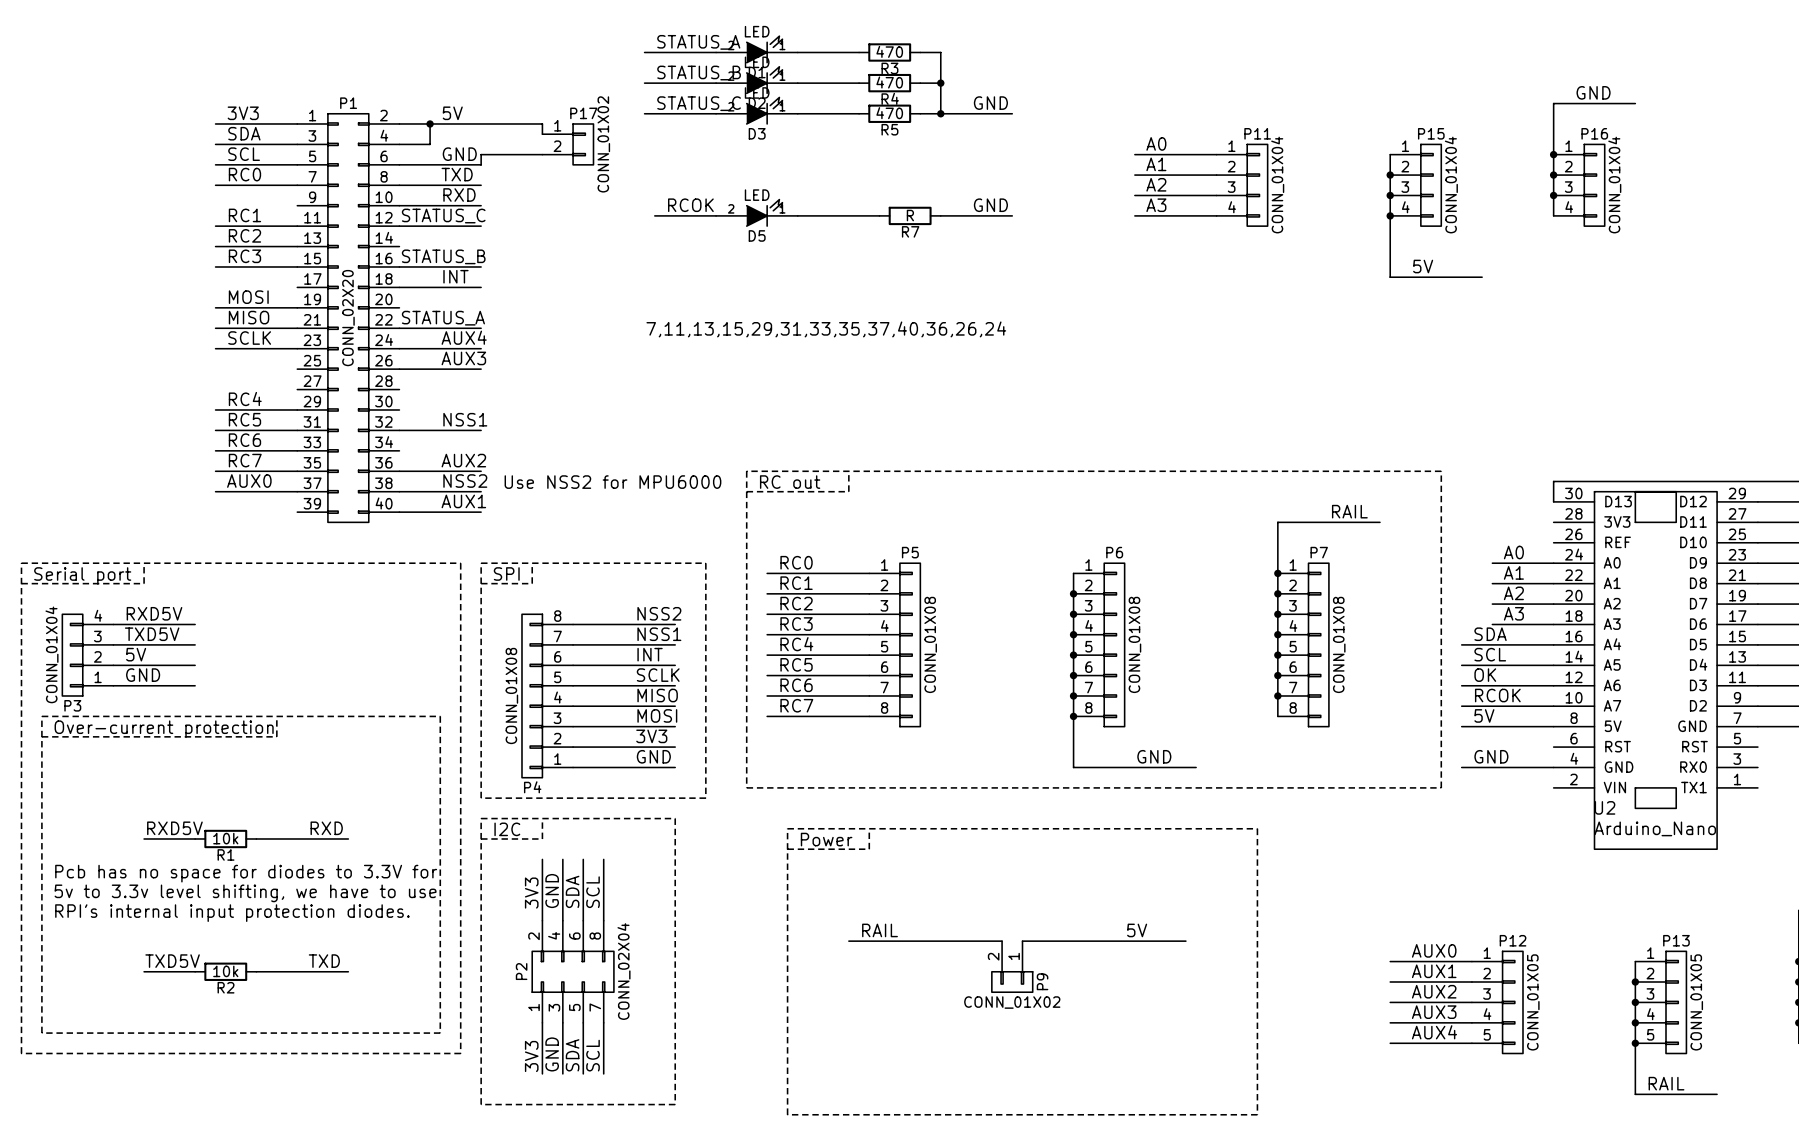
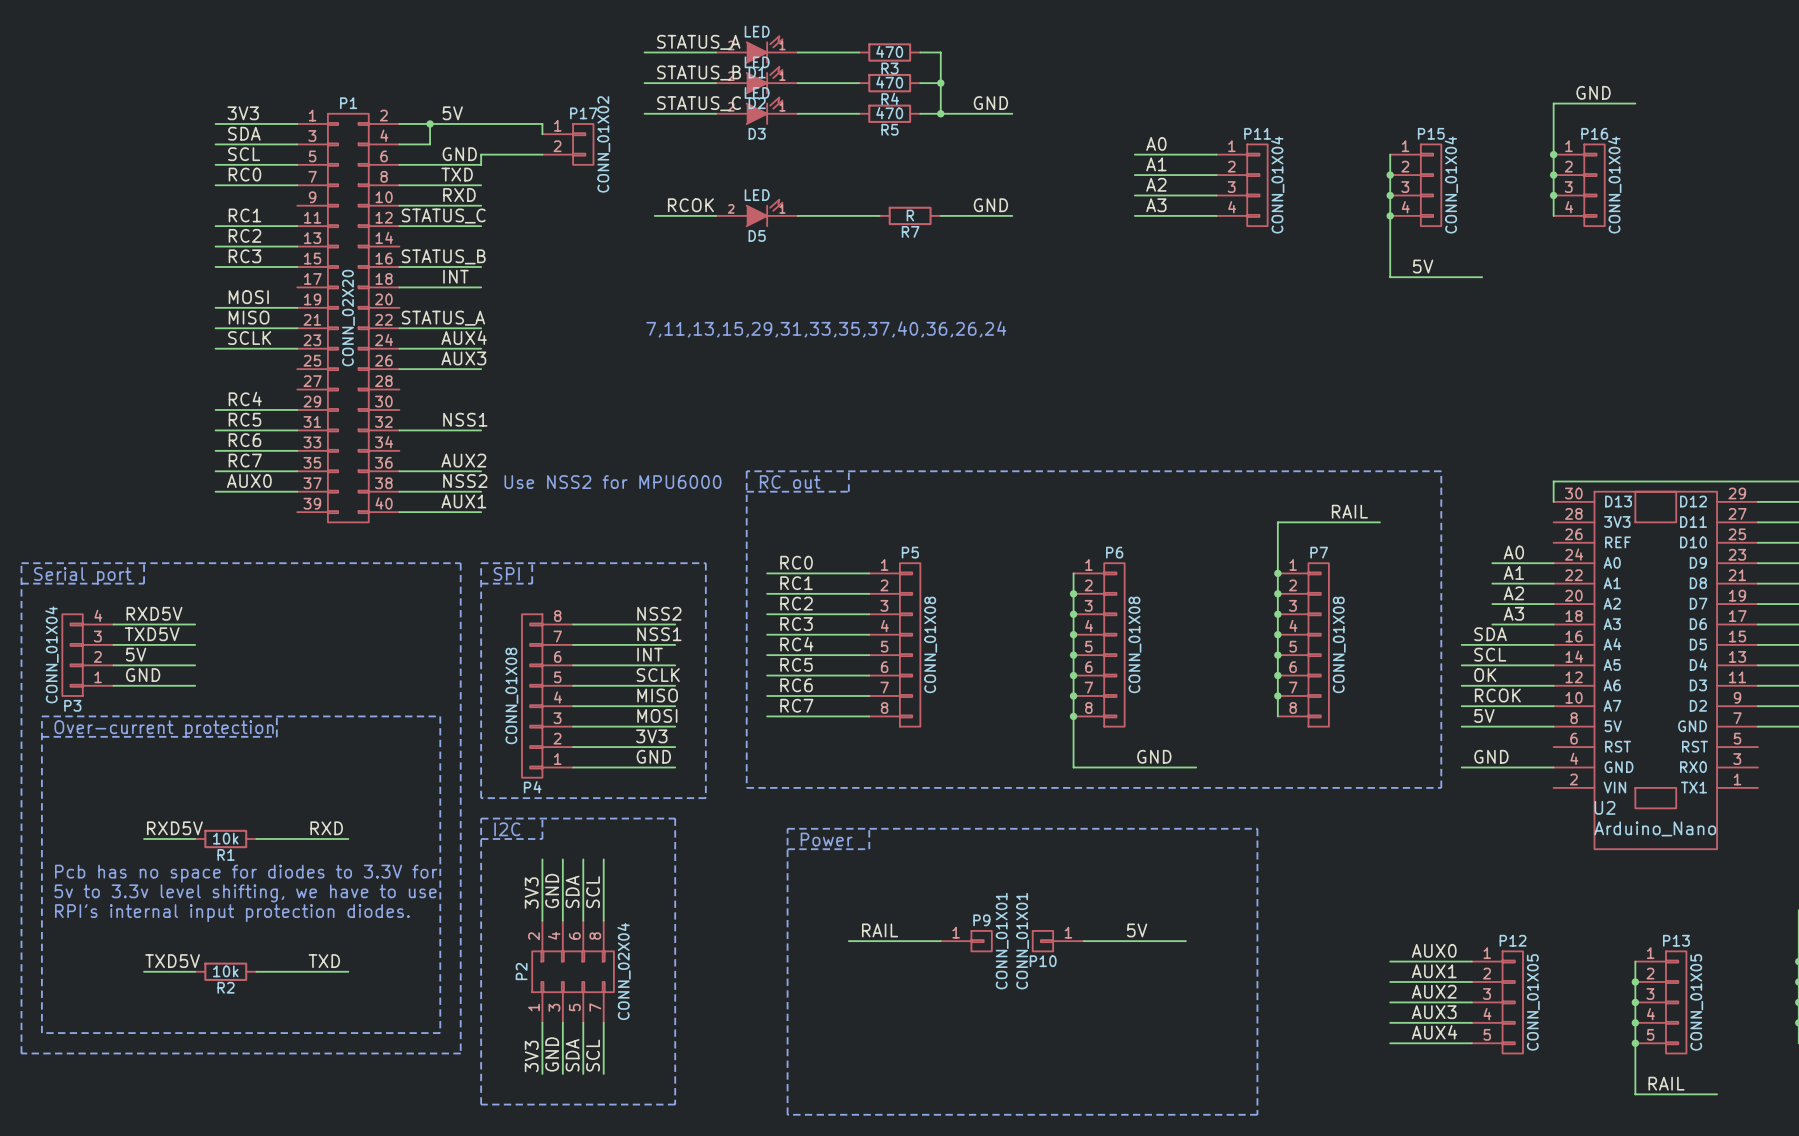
P9 symbol: [991, 941, 1033, 993] -> [940, 930, 992, 952]
P10: none -> CONN_01X01 (1058, 941)
P9 name position: P9 (1042, 981) -> P9 (981, 920)
P9 value: CONN_01X02 (1012, 1002) -> CONN_01X01 (1002, 941)

